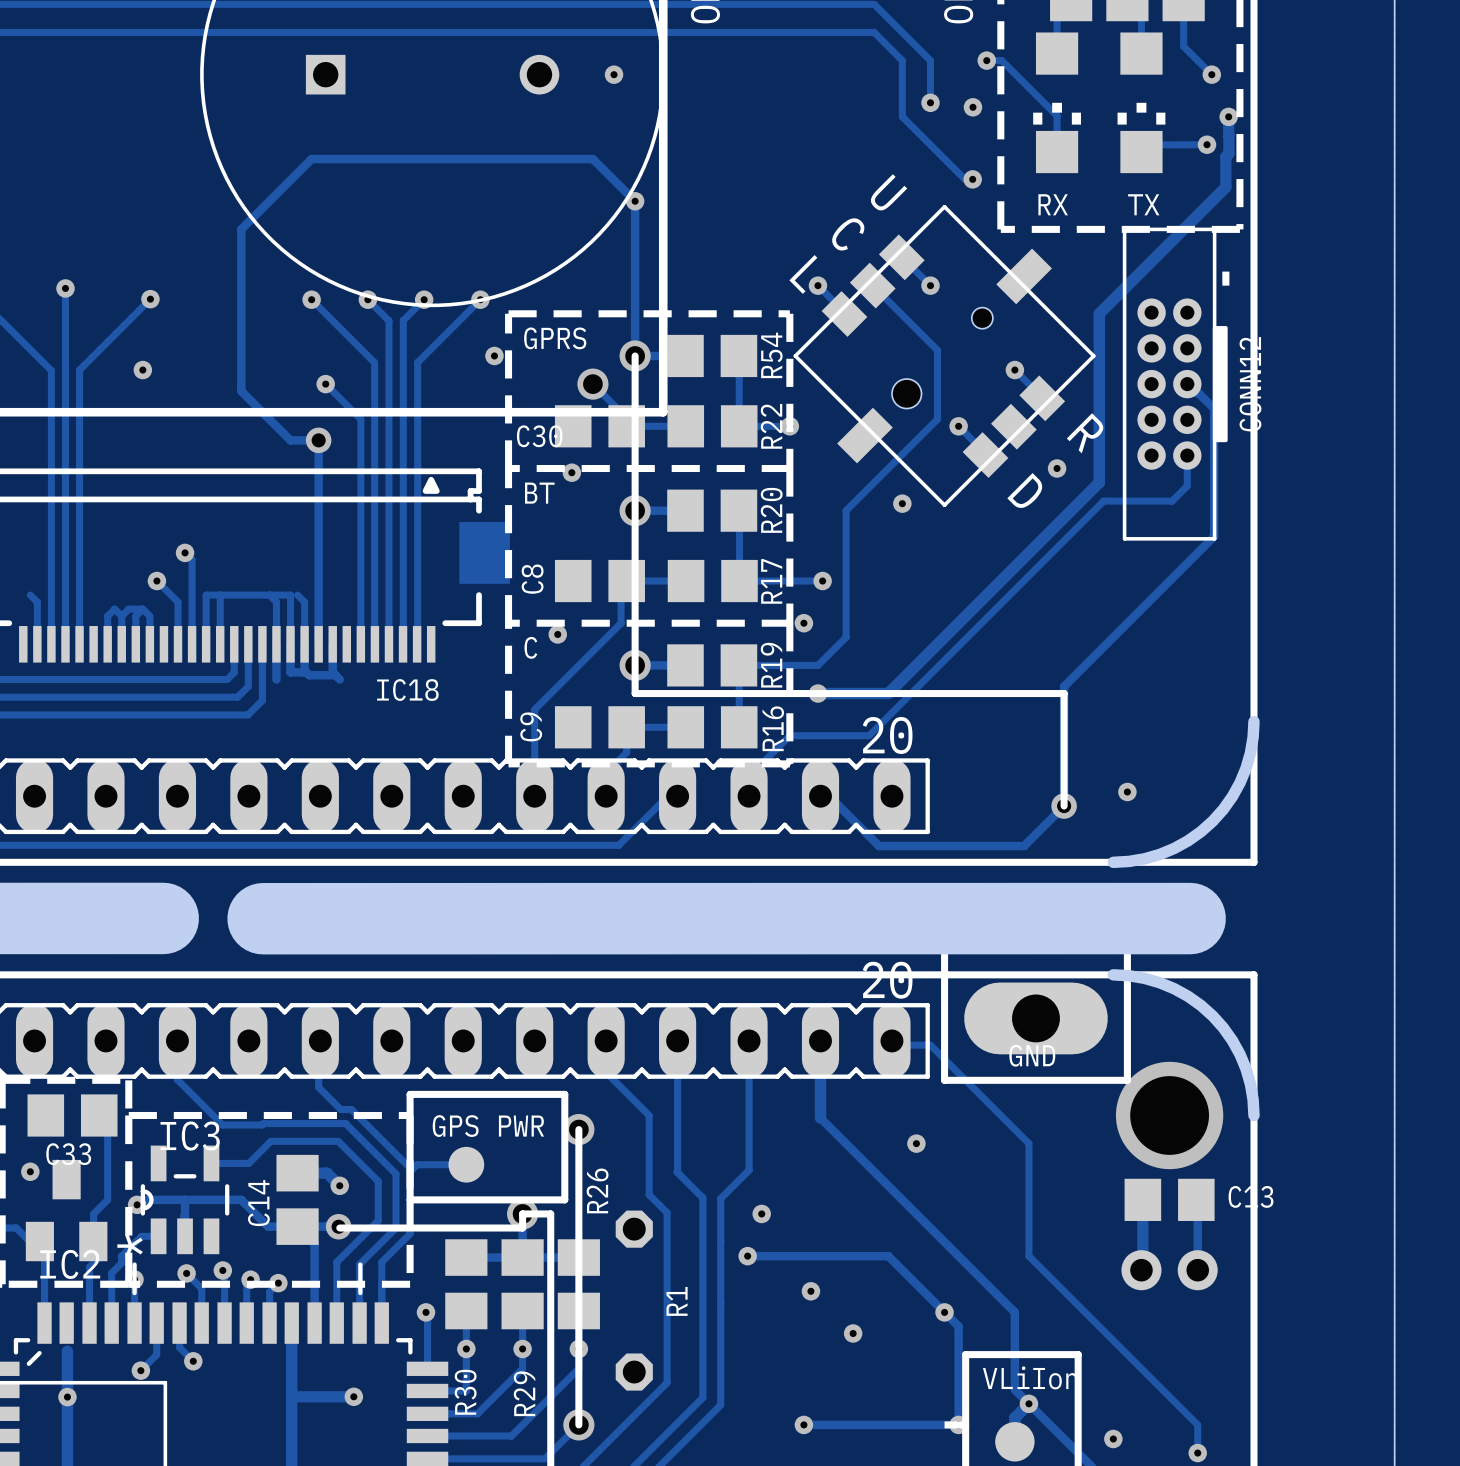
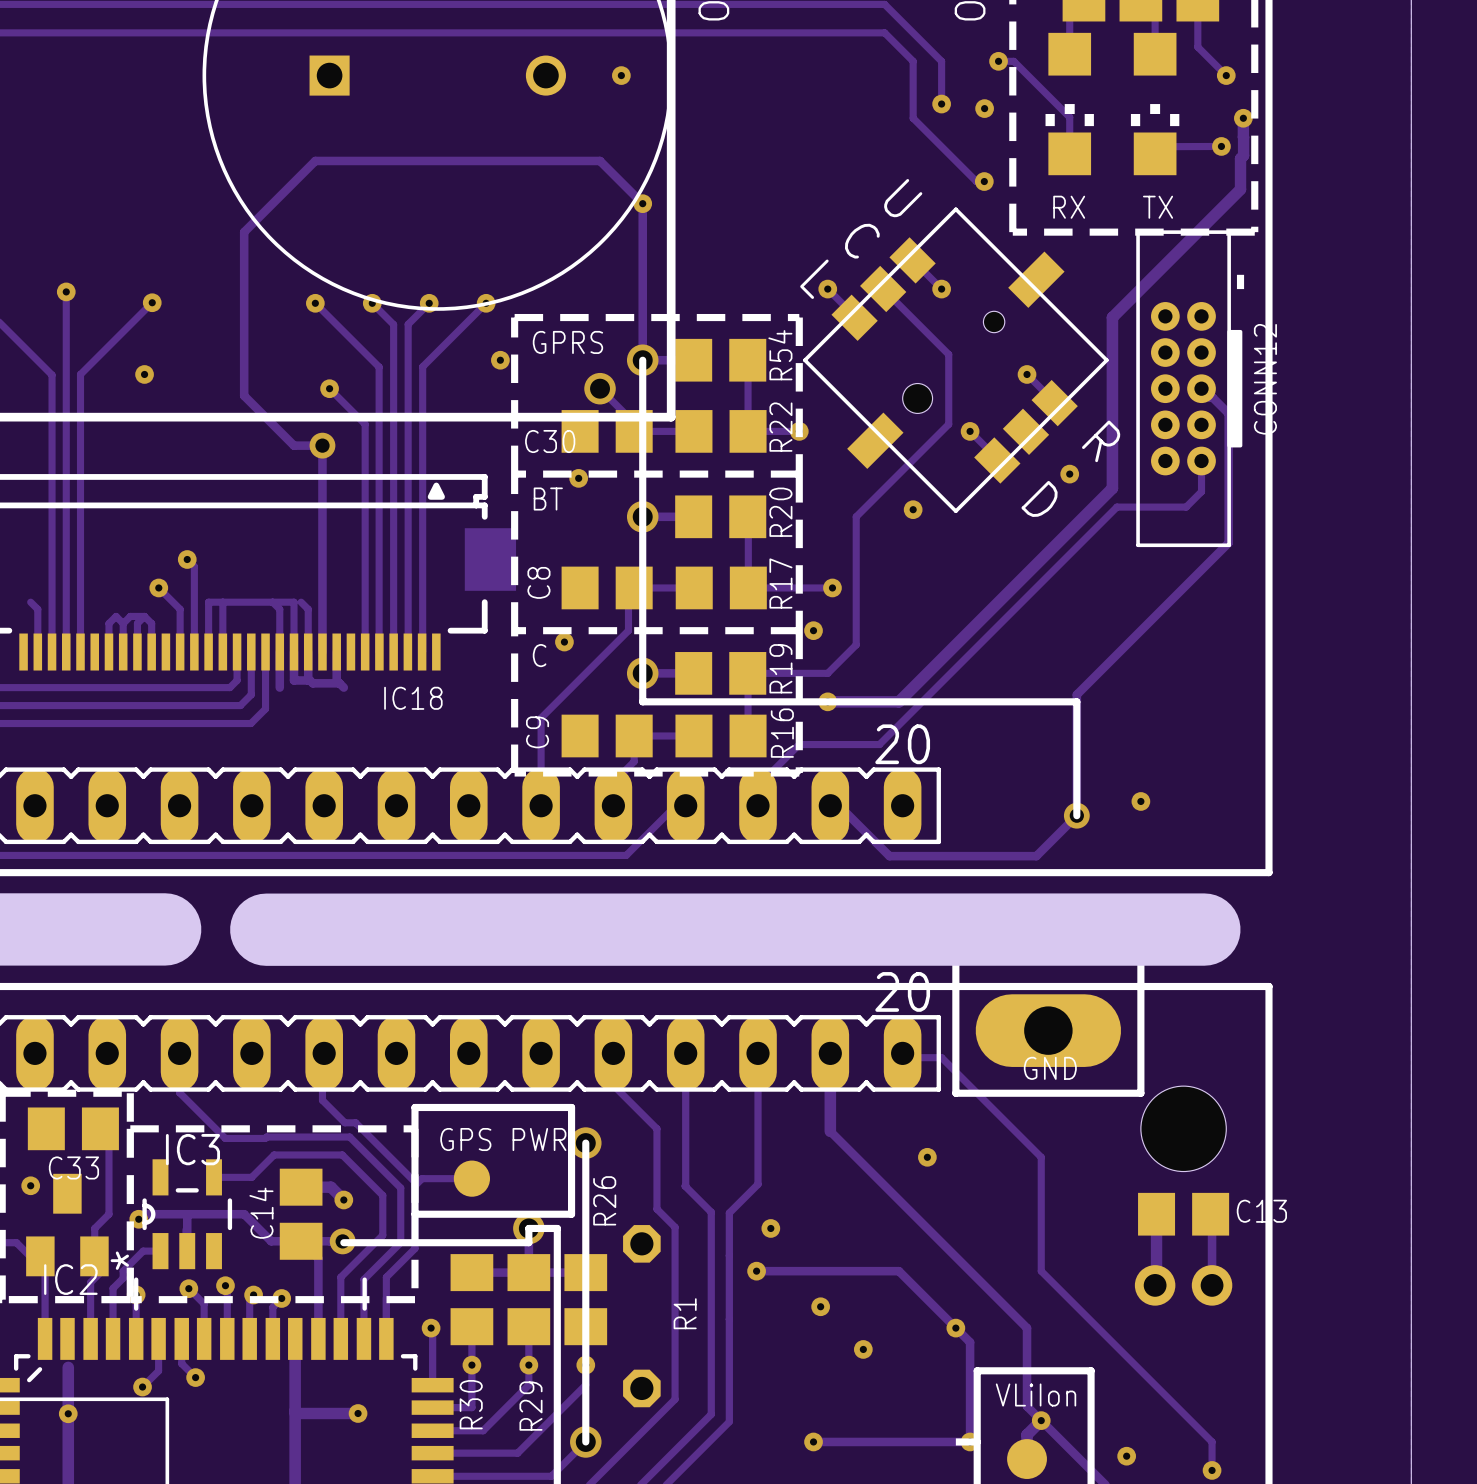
board edge: (1253, 721) (1253, 737) (1246, 768) (1232, 796) (1212, 821) (1188, 840) (1159, 854) (1129, 861) (1113, 862) -> none
board edge: (1113, 974) (1129, 975) (1159, 982) (1188, 996) (1212, 1016) (1232, 1040) (1246, 1069) (1253, 1099) (1253, 1115) -> none
hole: none -> (1183, 1128)
via: (1169, 1115) -> none

